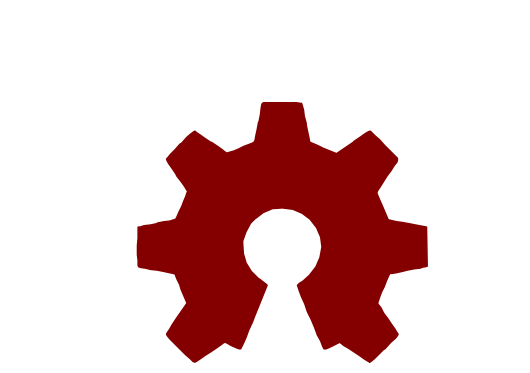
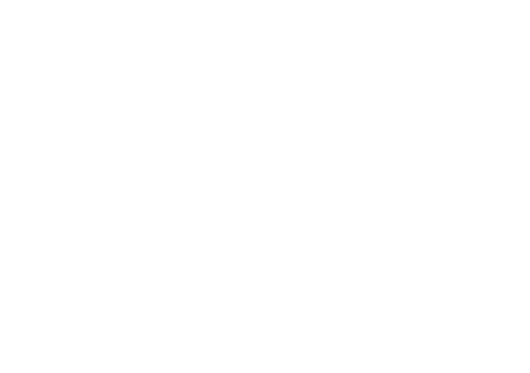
power symbol: (282, 232) -> none

